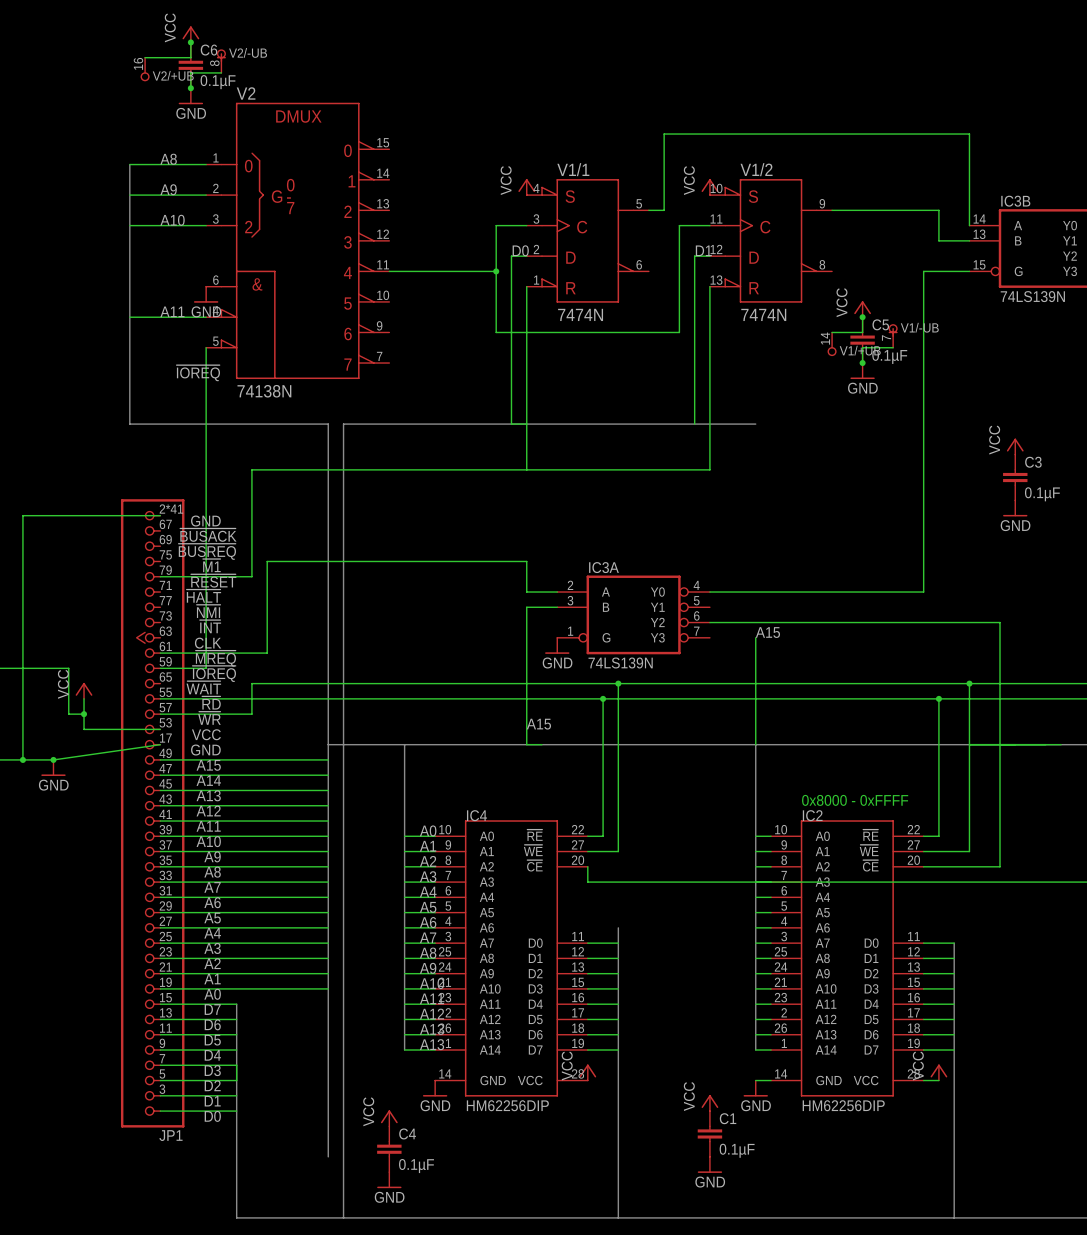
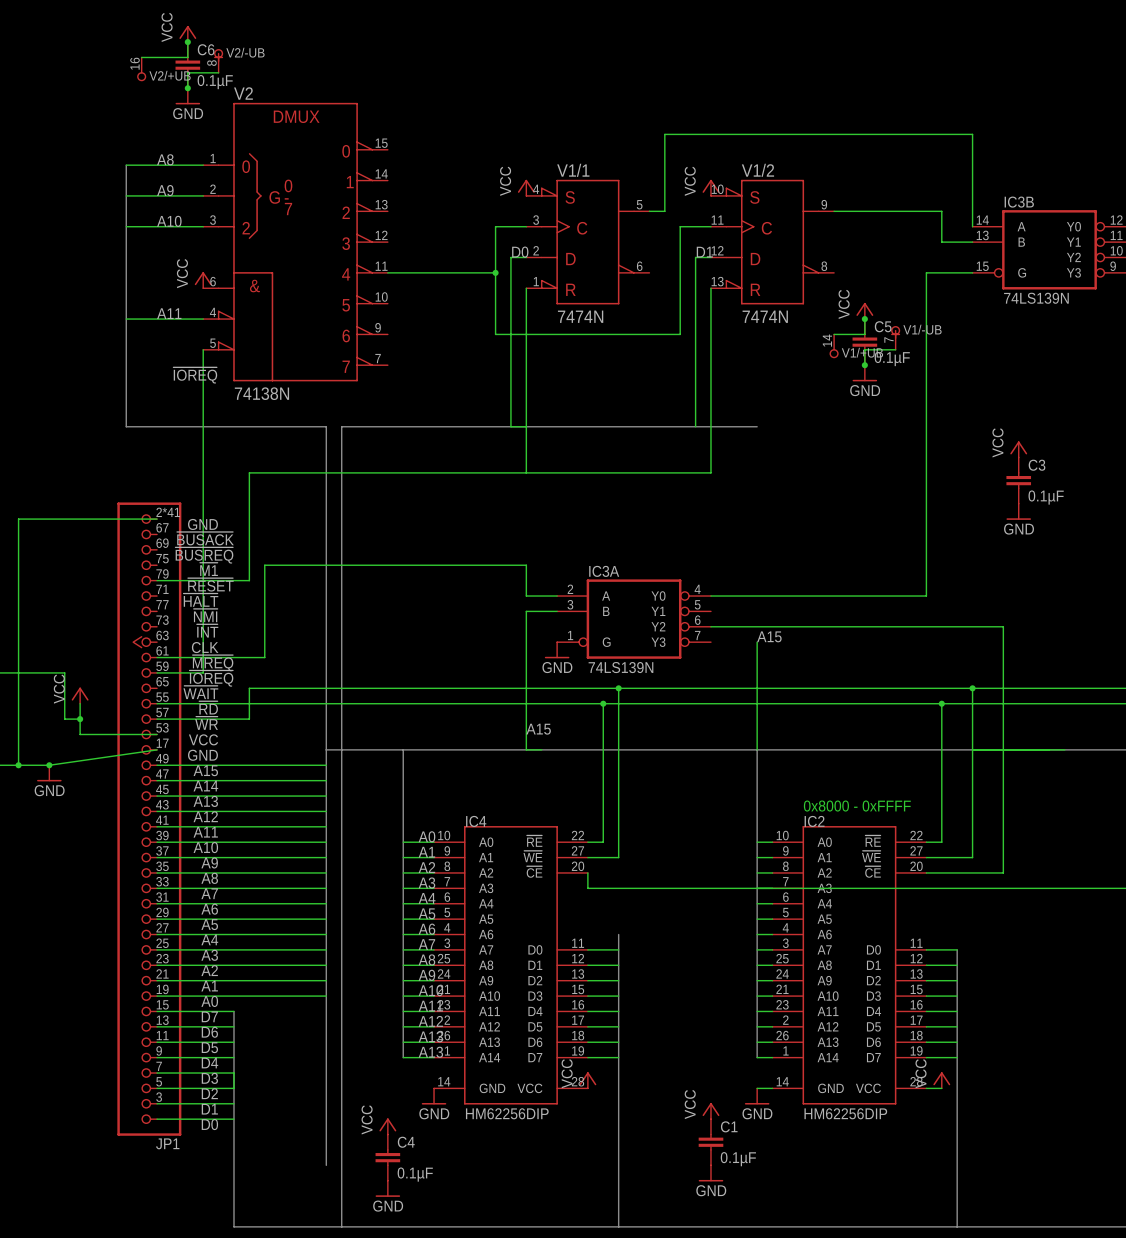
power symbol: none -> VCC (203, 280)
power symbol: GND (206, 294) -> none

